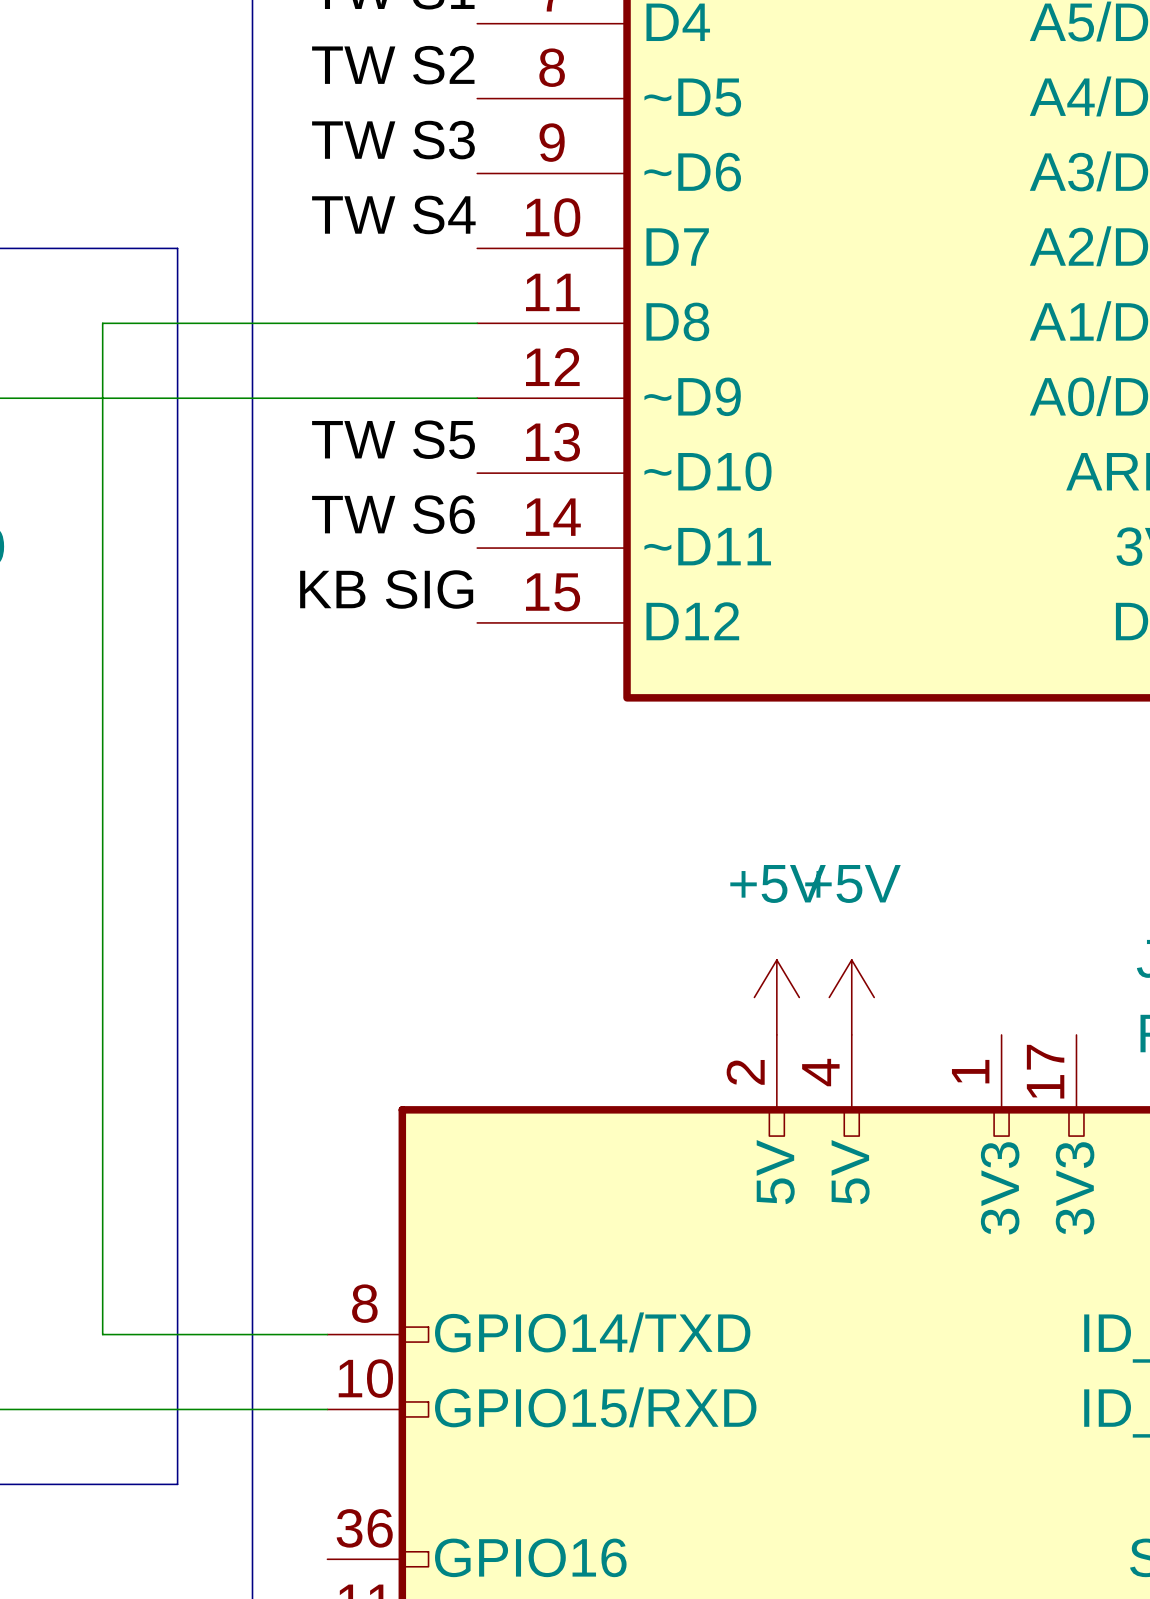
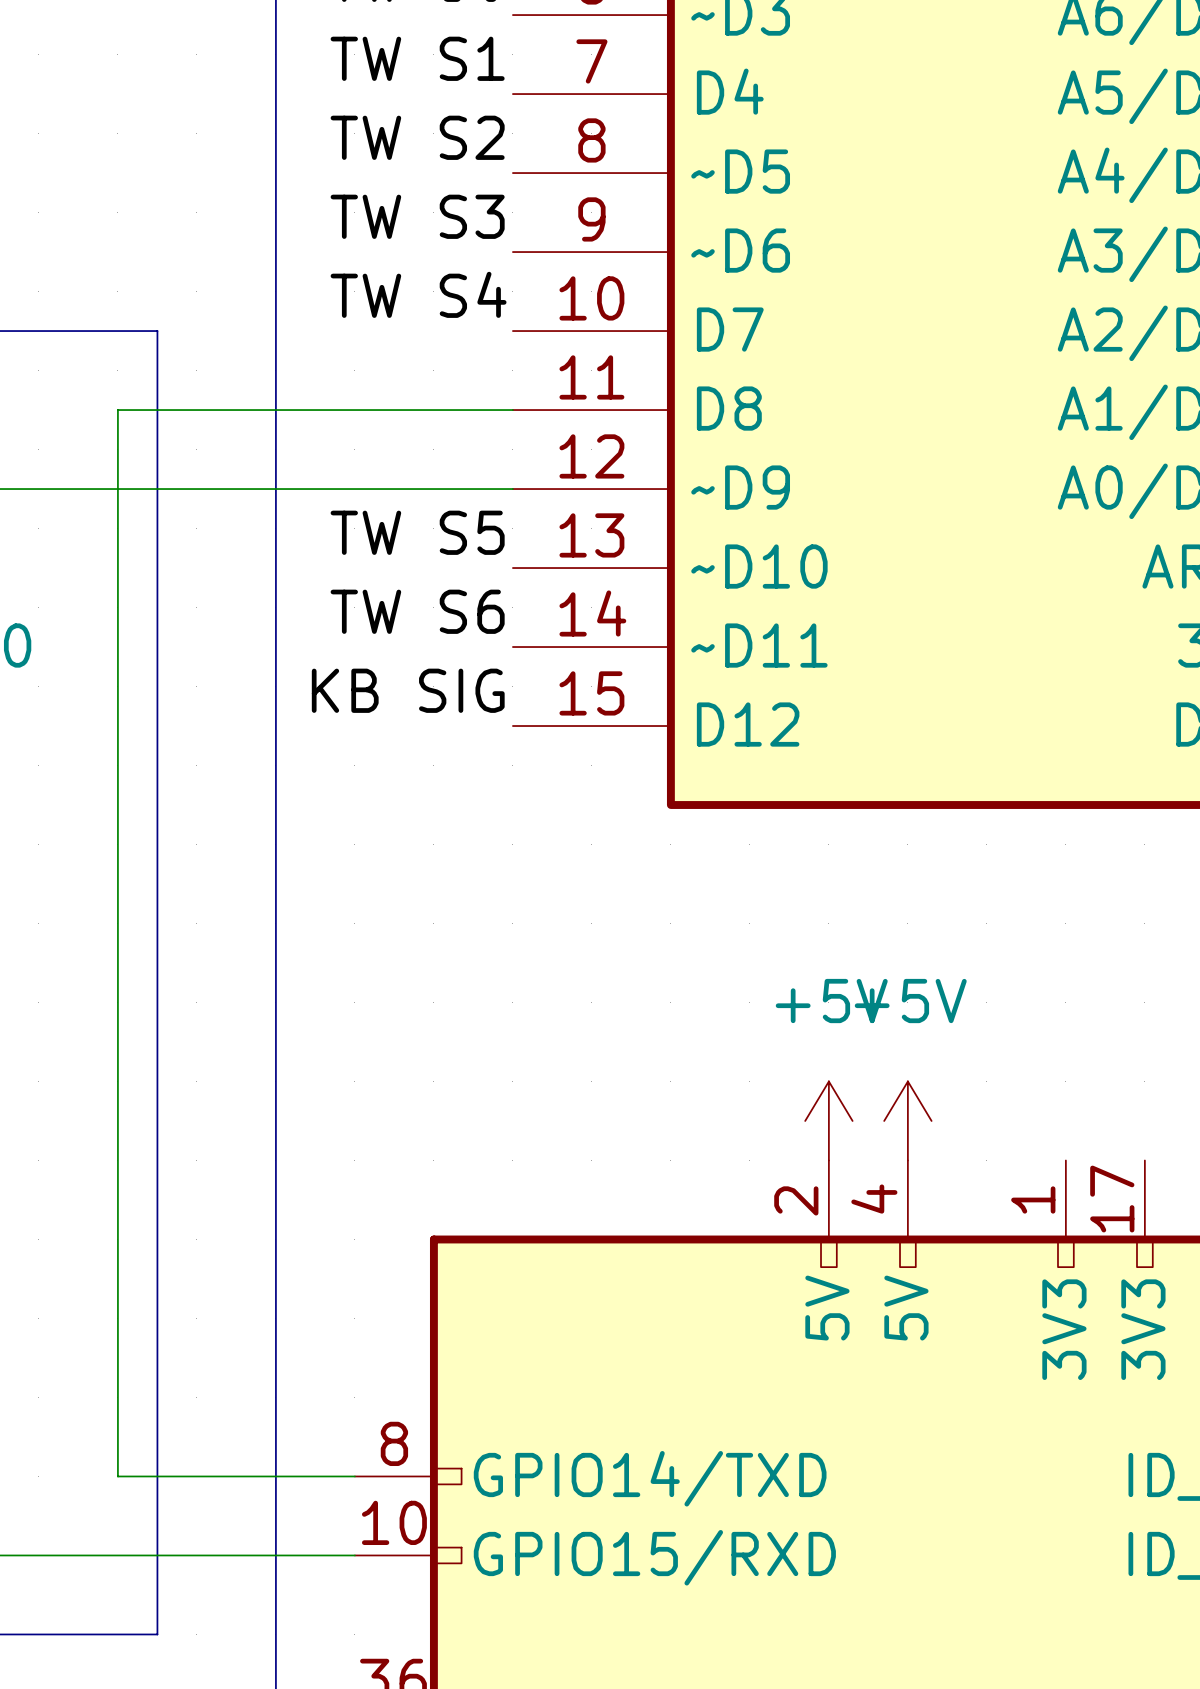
line: (140, 248) (177, 248) (177, 1484) (140, 1484) -> (157, 331) (157, 1634)

